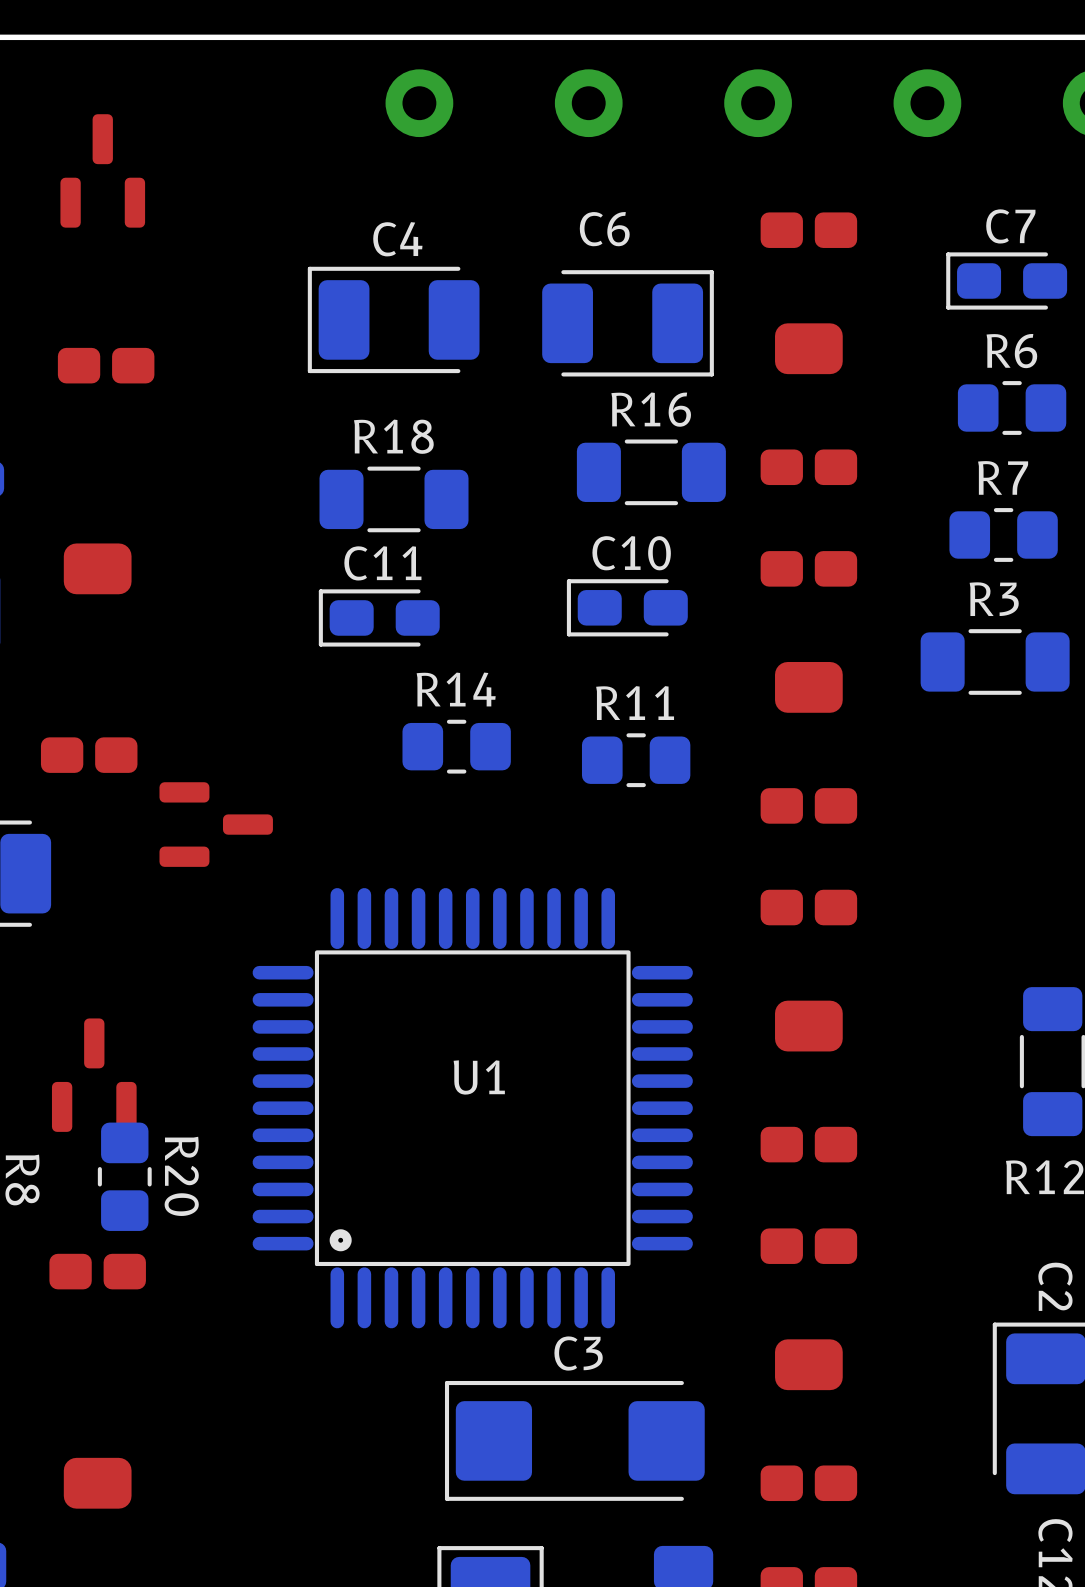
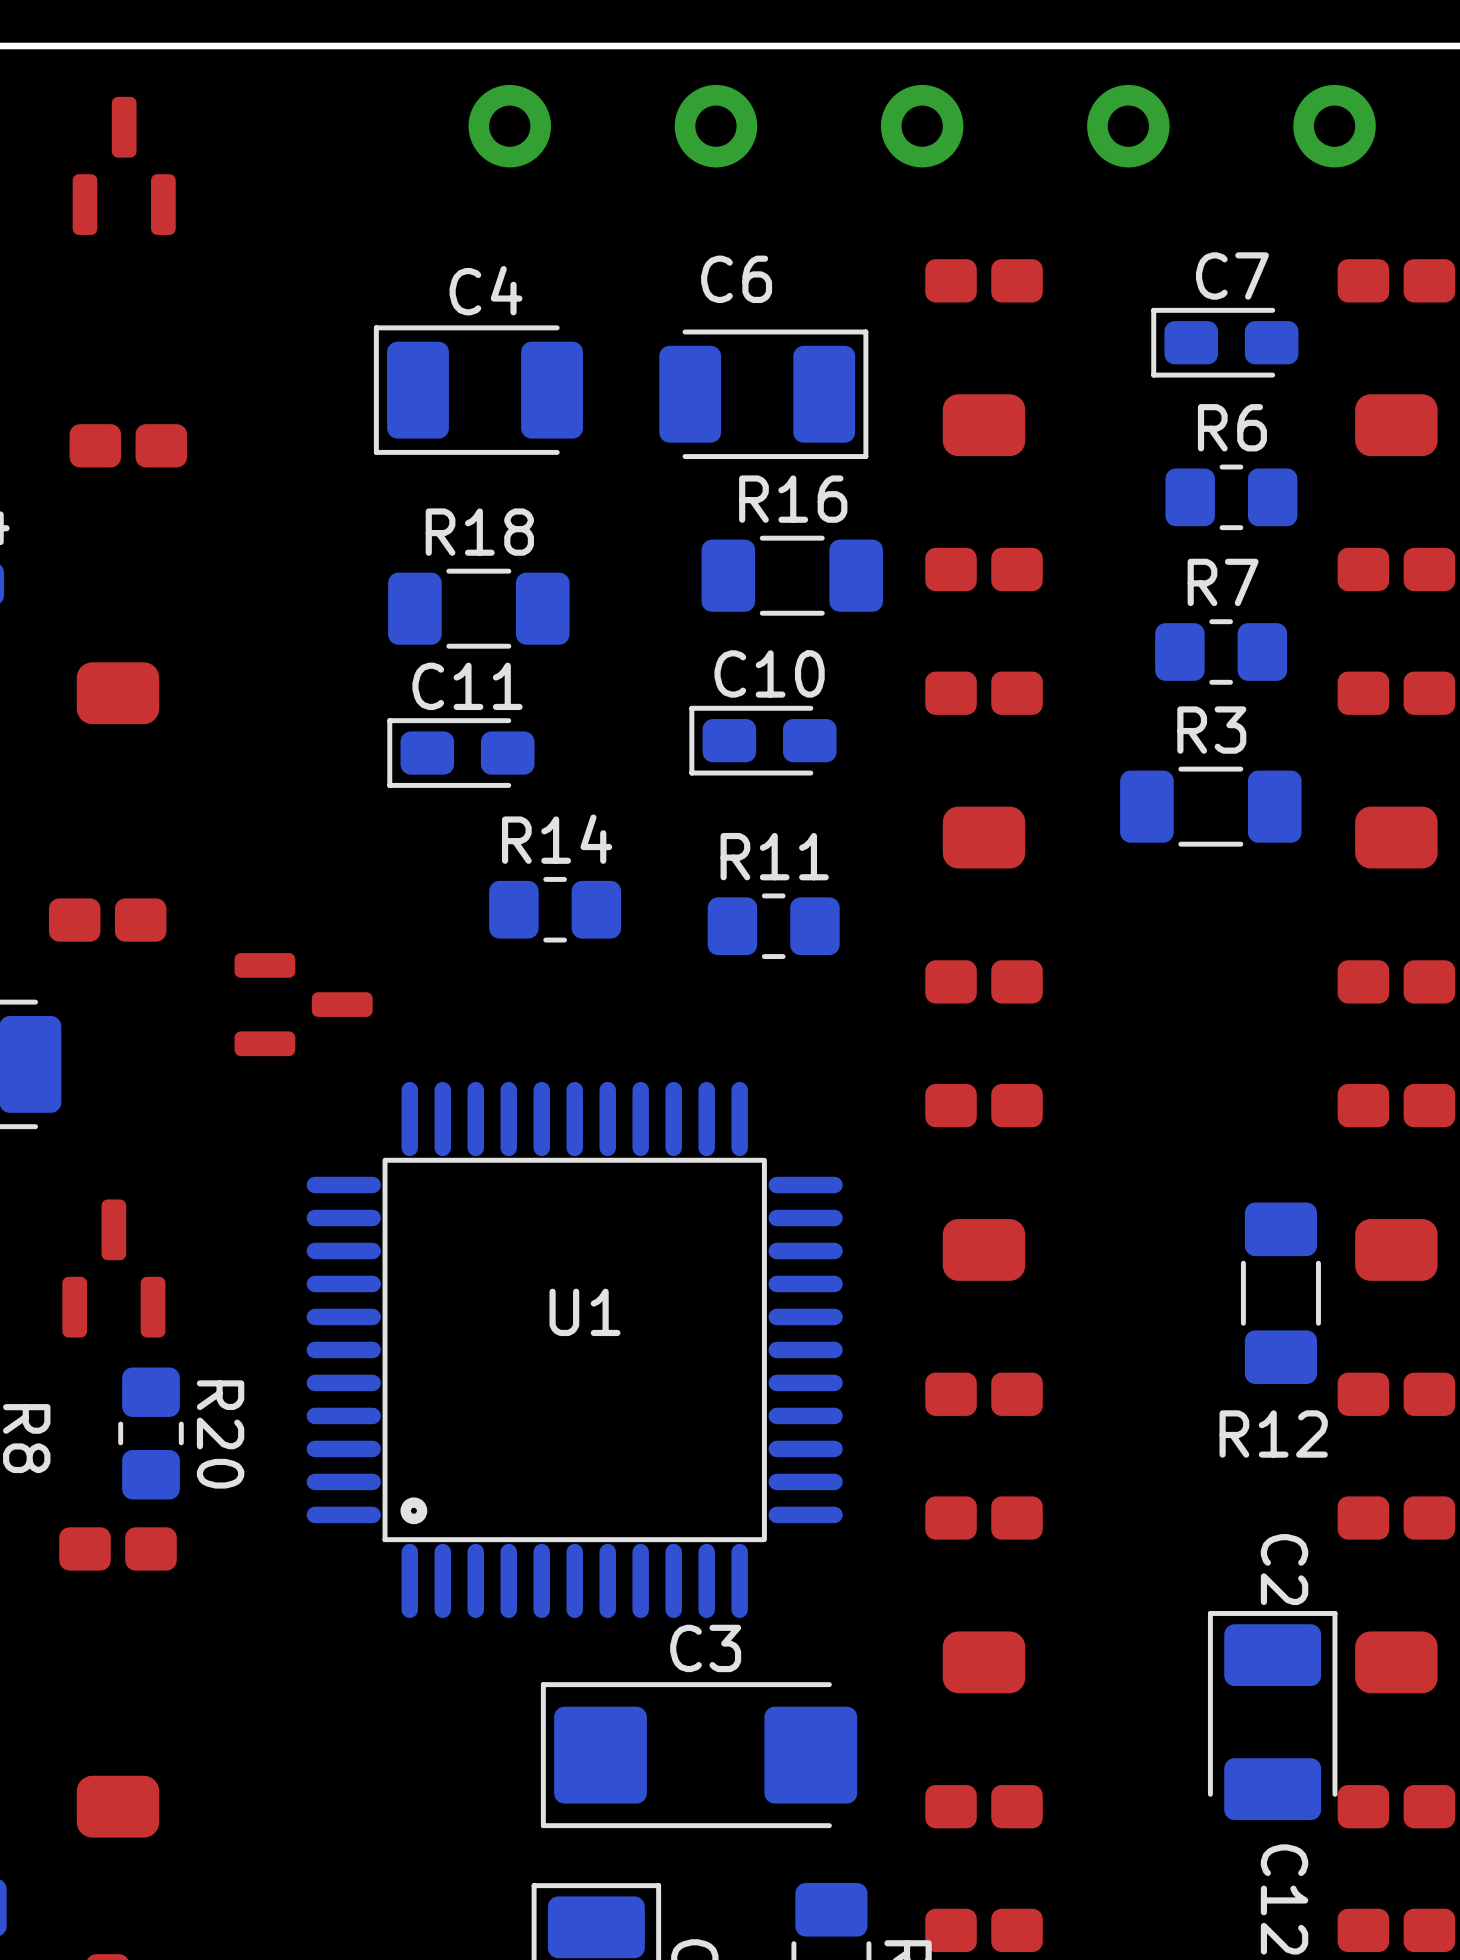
part position: (102, 170) -> (124, 165)
part position: (216, 824) -> (303, 1004)
part position: (94, 1075) -> (113, 1268)

